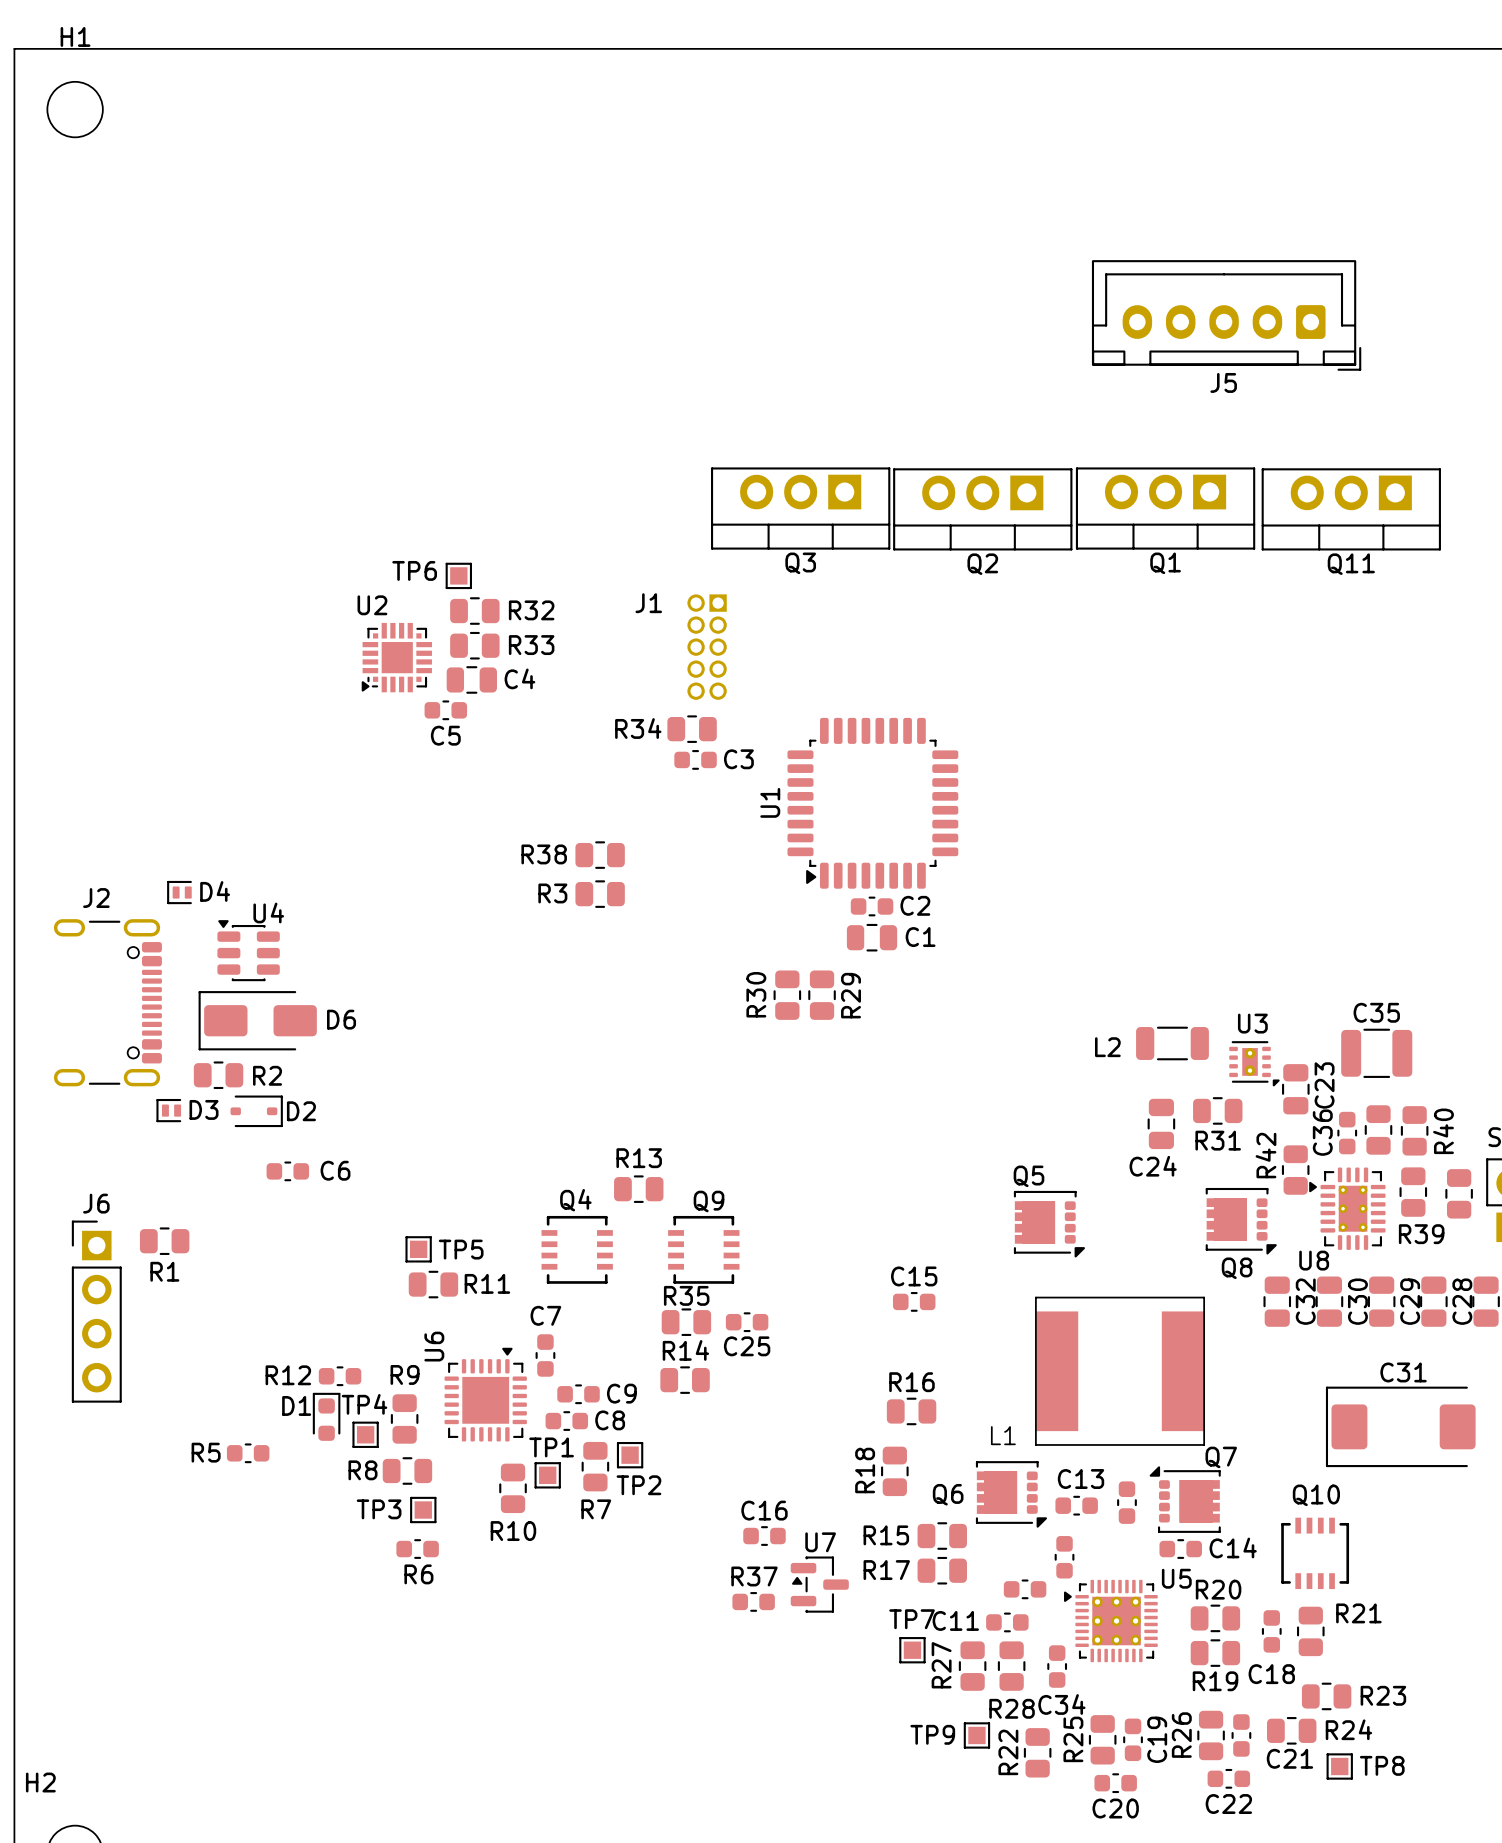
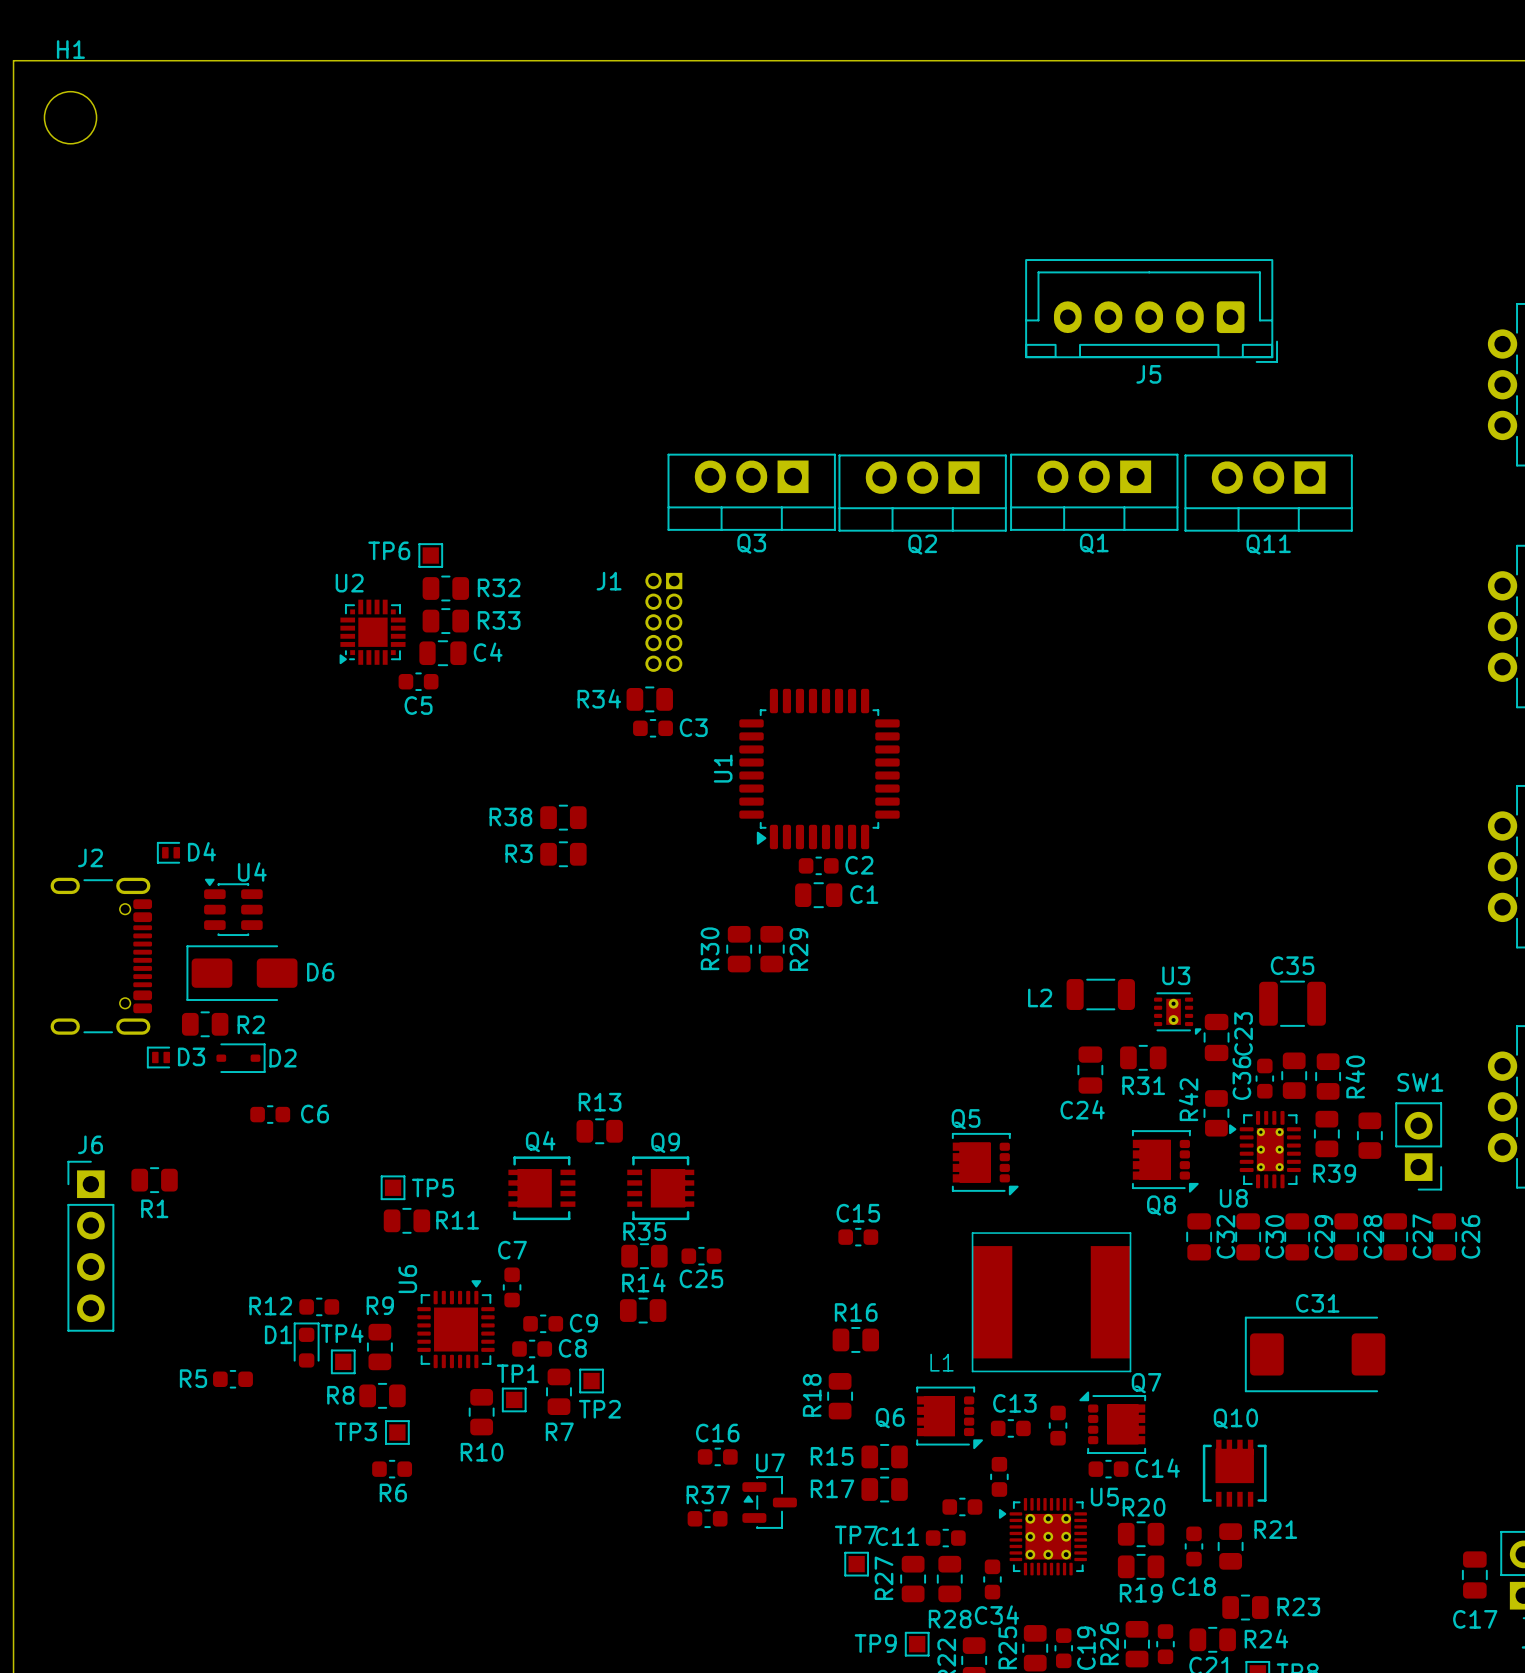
Q4 footprint: [541, 1215, 613, 1284] -> [508, 1156, 576, 1221]
Q9 footprint: [668, 1215, 740, 1284] -> [627, 1156, 695, 1221]
Q10 footprint: [1281, 1517, 1350, 1590] -> [1202, 1439, 1267, 1507]

